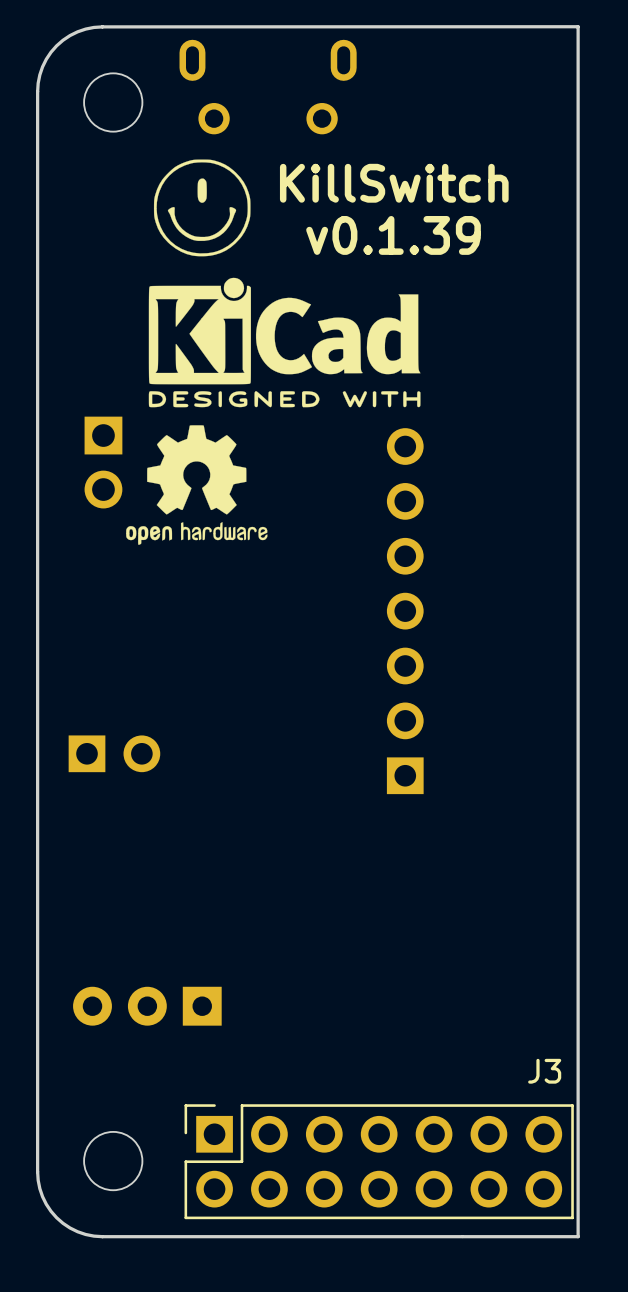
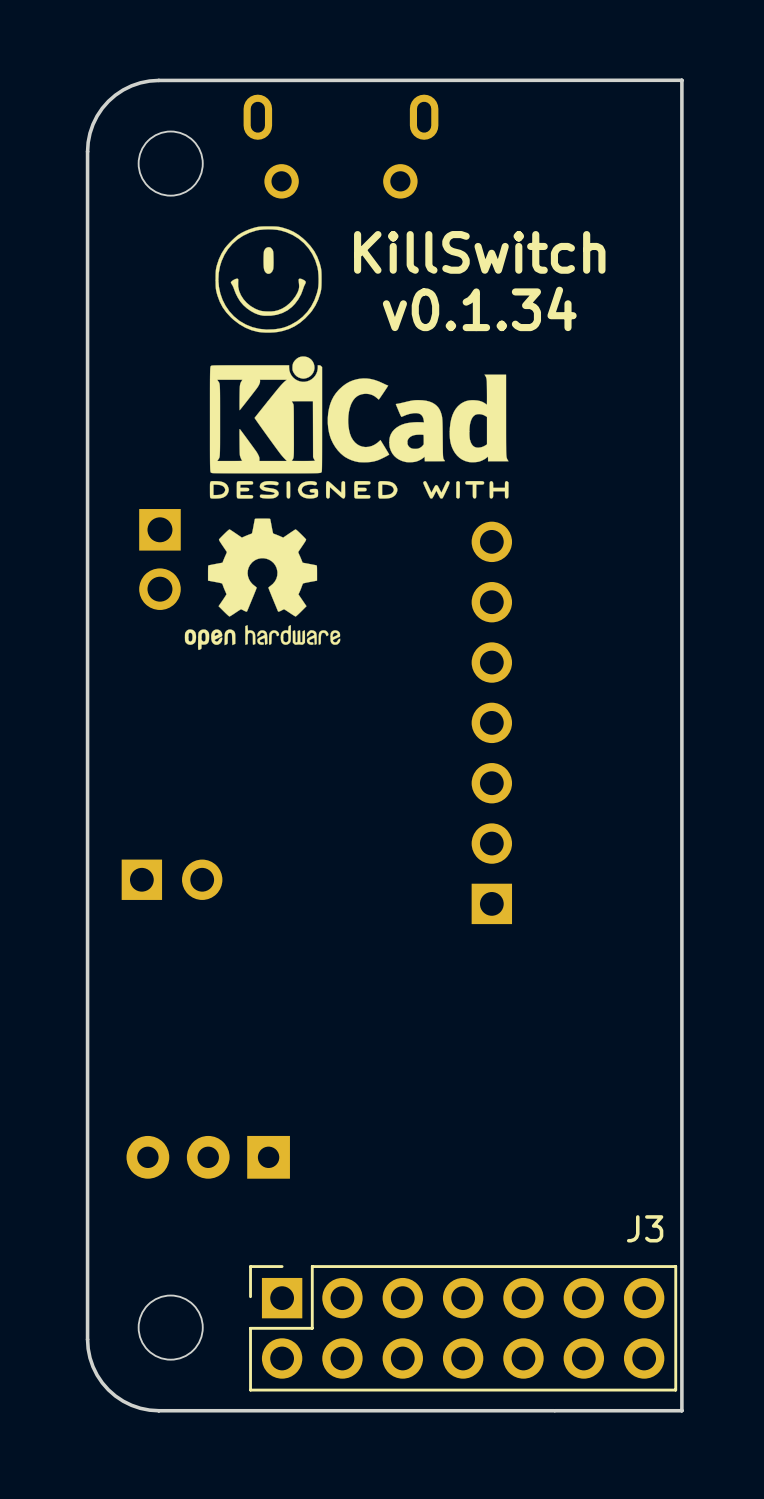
text: v0.1.39 (393, 235) -> v0.1.34 (479, 308)

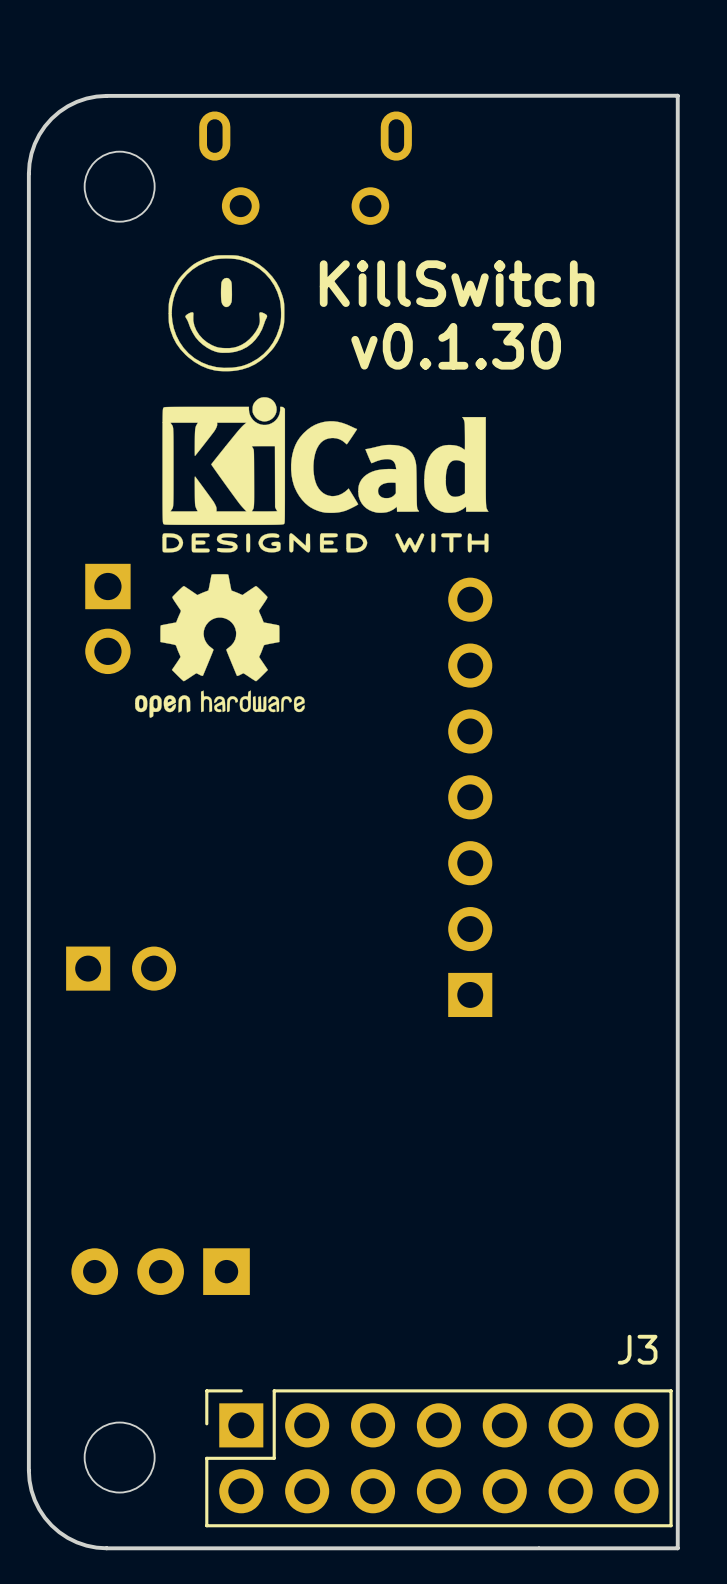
text: v0.1.34 (479, 308) -> v0.1.30 (456, 346)

